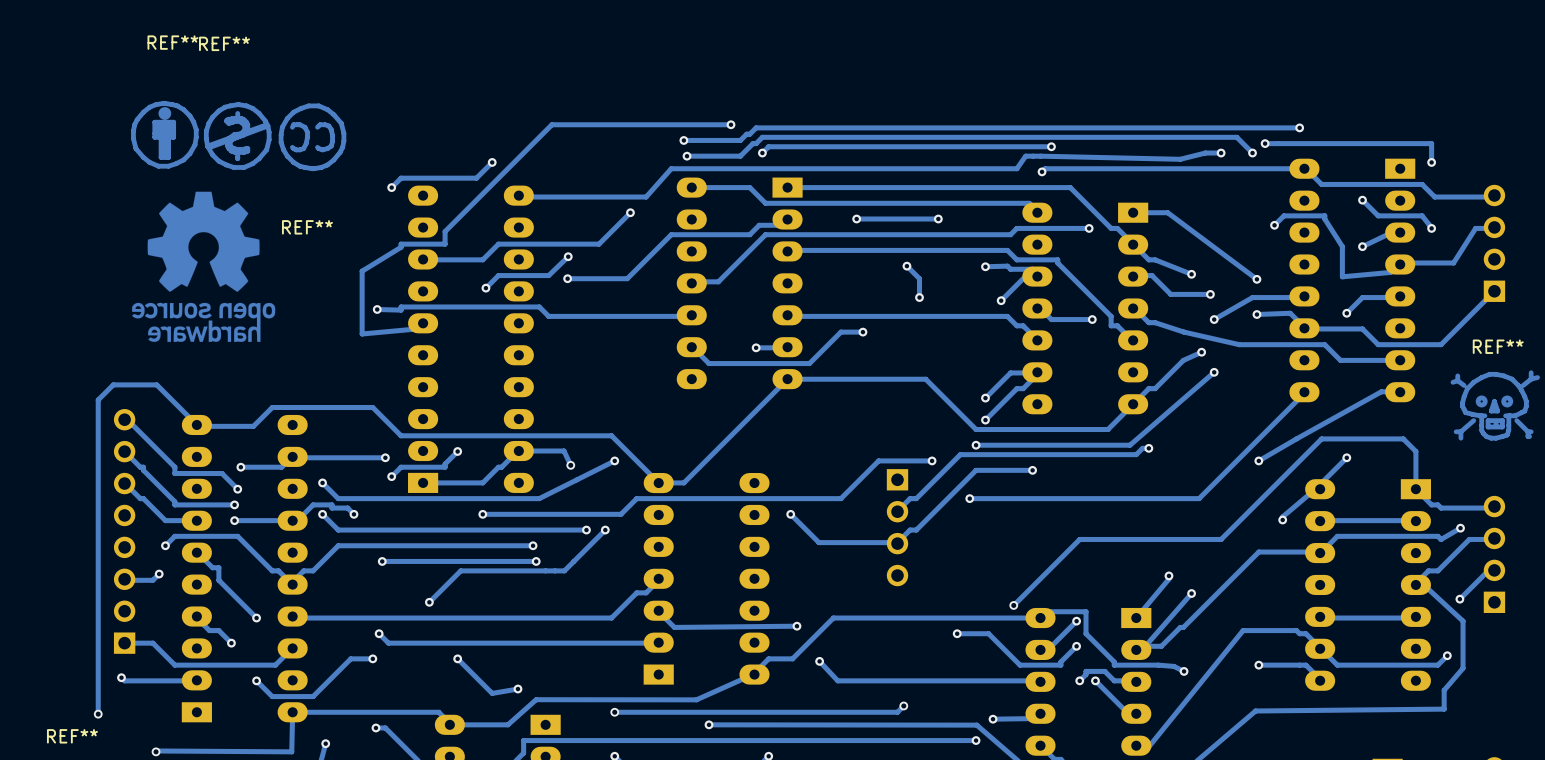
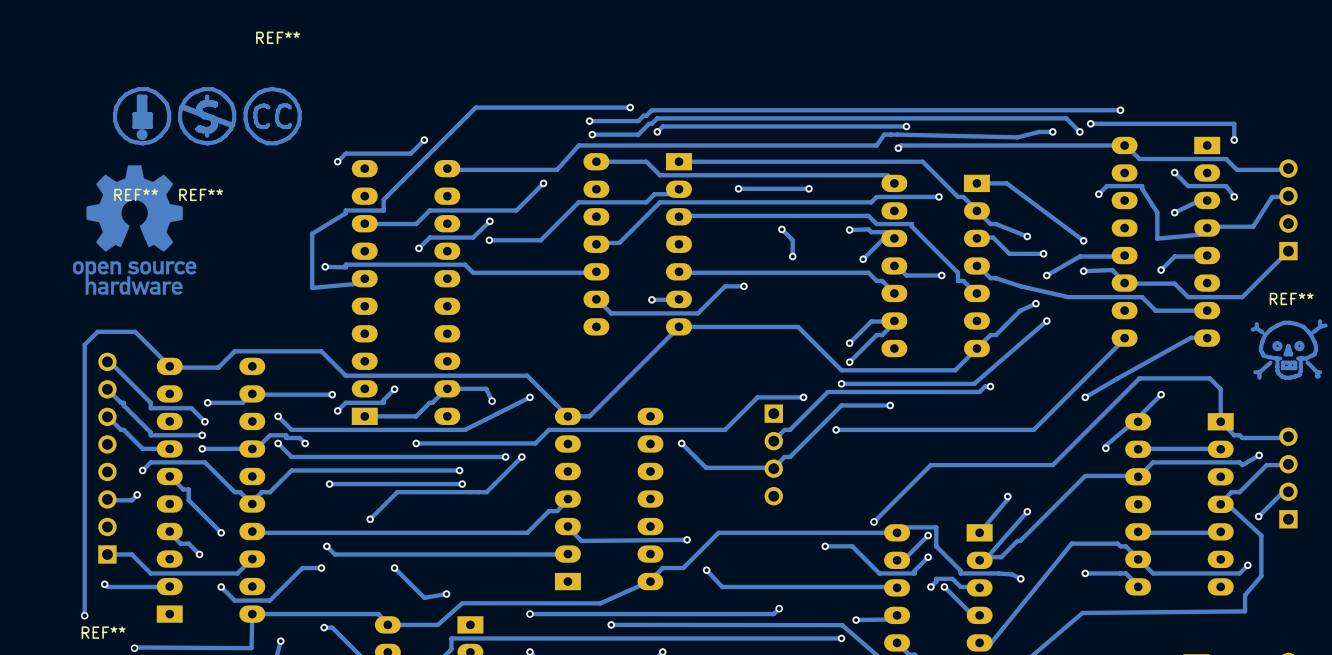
REF** name position: REF** (224, 43) -> REF** (201, 194)
REF** footprint: [203, 102, 272, 170] -> [177, 87, 237, 146]
REF** rotation: 0° (164, 134) -> 180° (142, 116)
REF** rotation: 0° (312, 137) -> 180° (272, 116)
drawing: none -> [72, 165, 197, 295]
drawing: [132, 191, 276, 342] -> none
REF** name position: REF** (72, 736) -> REF** (103, 632)

